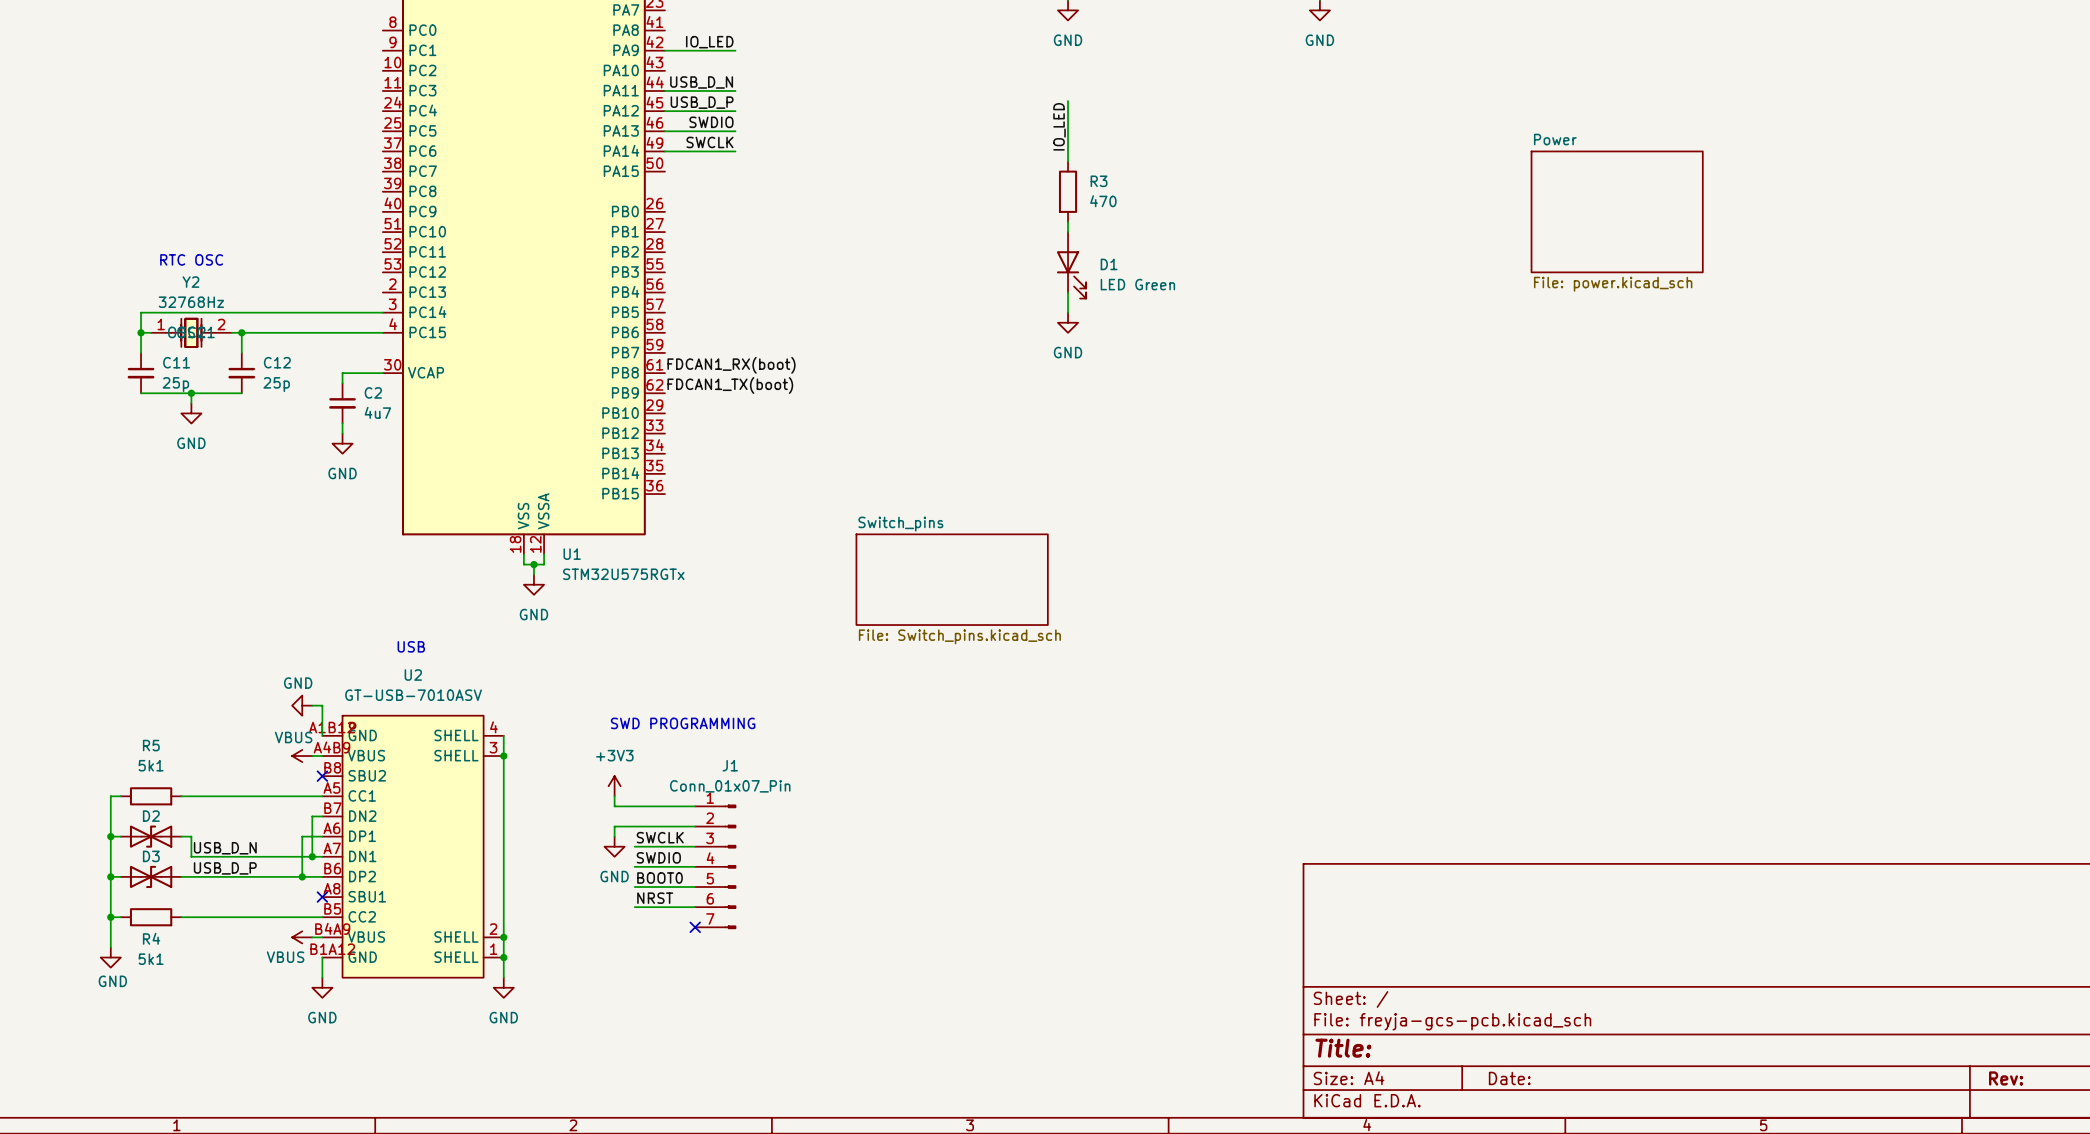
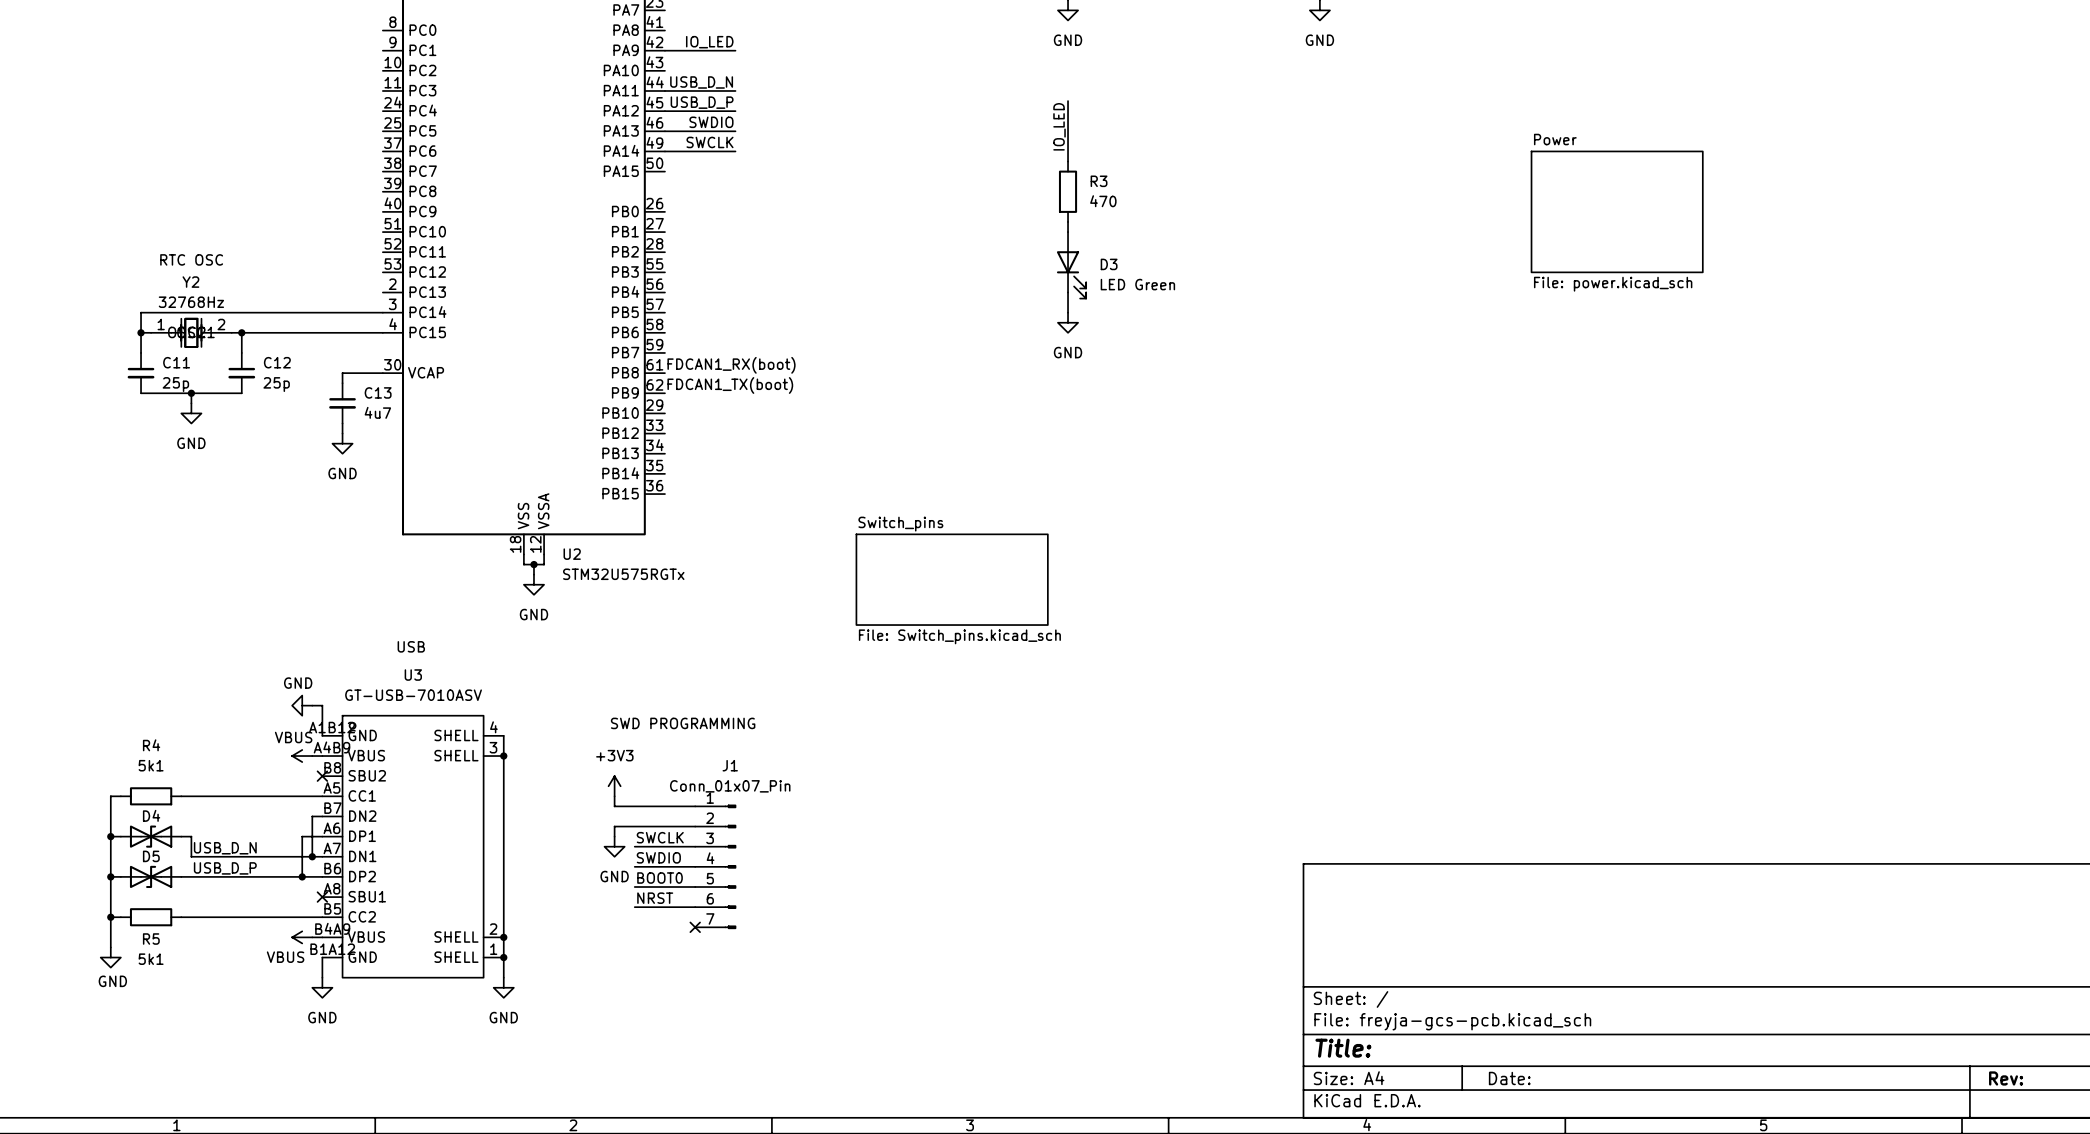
D1 name: D1 (1109, 264) -> D3 (1109, 264)
C2 name: C2 (373, 392) -> C13 (378, 392)
U1 name: U1 (572, 554) -> U2 (572, 554)
U2 name: U2 (413, 675) -> U3 (413, 675)
R5 name: R5 (151, 745) -> R4 (151, 745)
D2 name: D2 (151, 816) -> D4 (151, 815)
D3 name: D3 (151, 856) -> D5 (151, 856)
R4 name: R4 (151, 938) -> R5 (151, 939)

